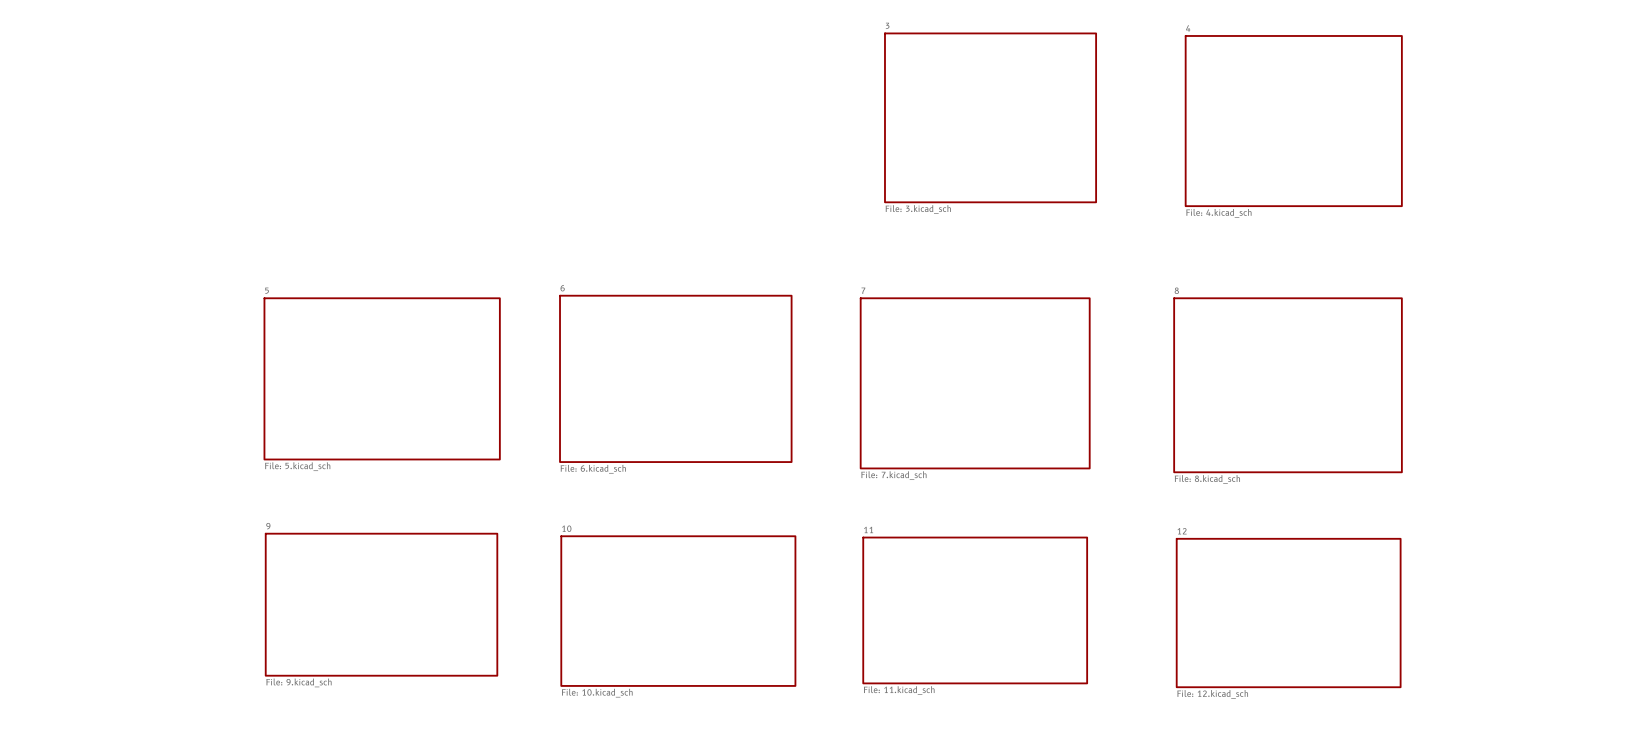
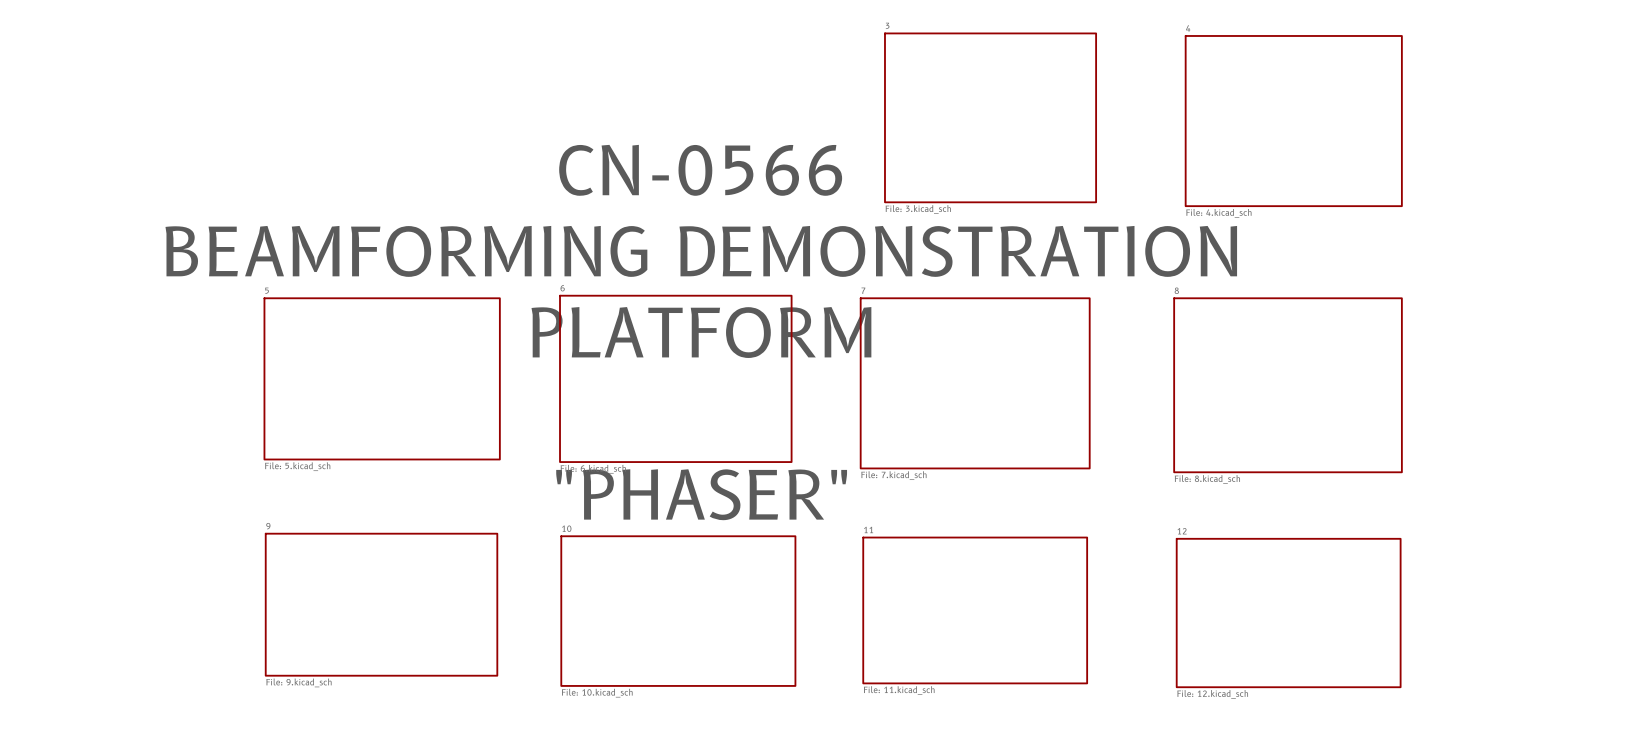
text: none -> CN-0566 (700, 170)
text: none -> BEAMFORMING DEMONSTRATION (701, 251)
text: none -> PLATFORM (701, 332)
text: none -> "PHASER" (701, 494)

